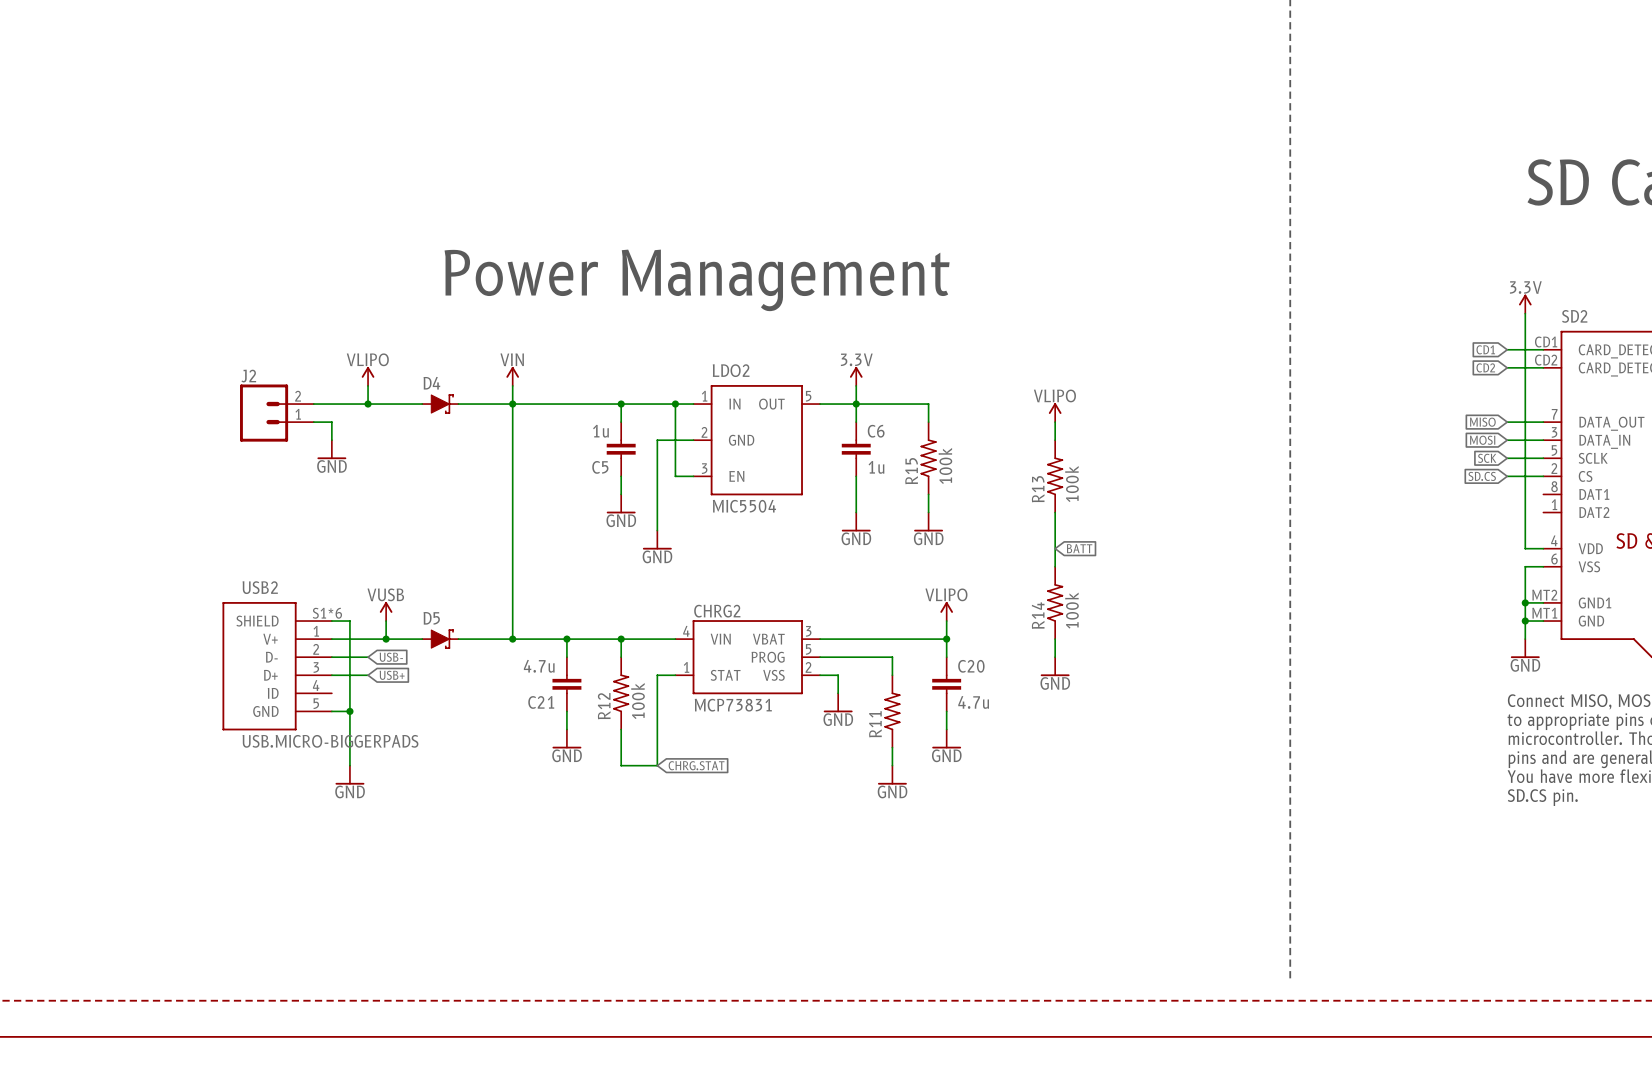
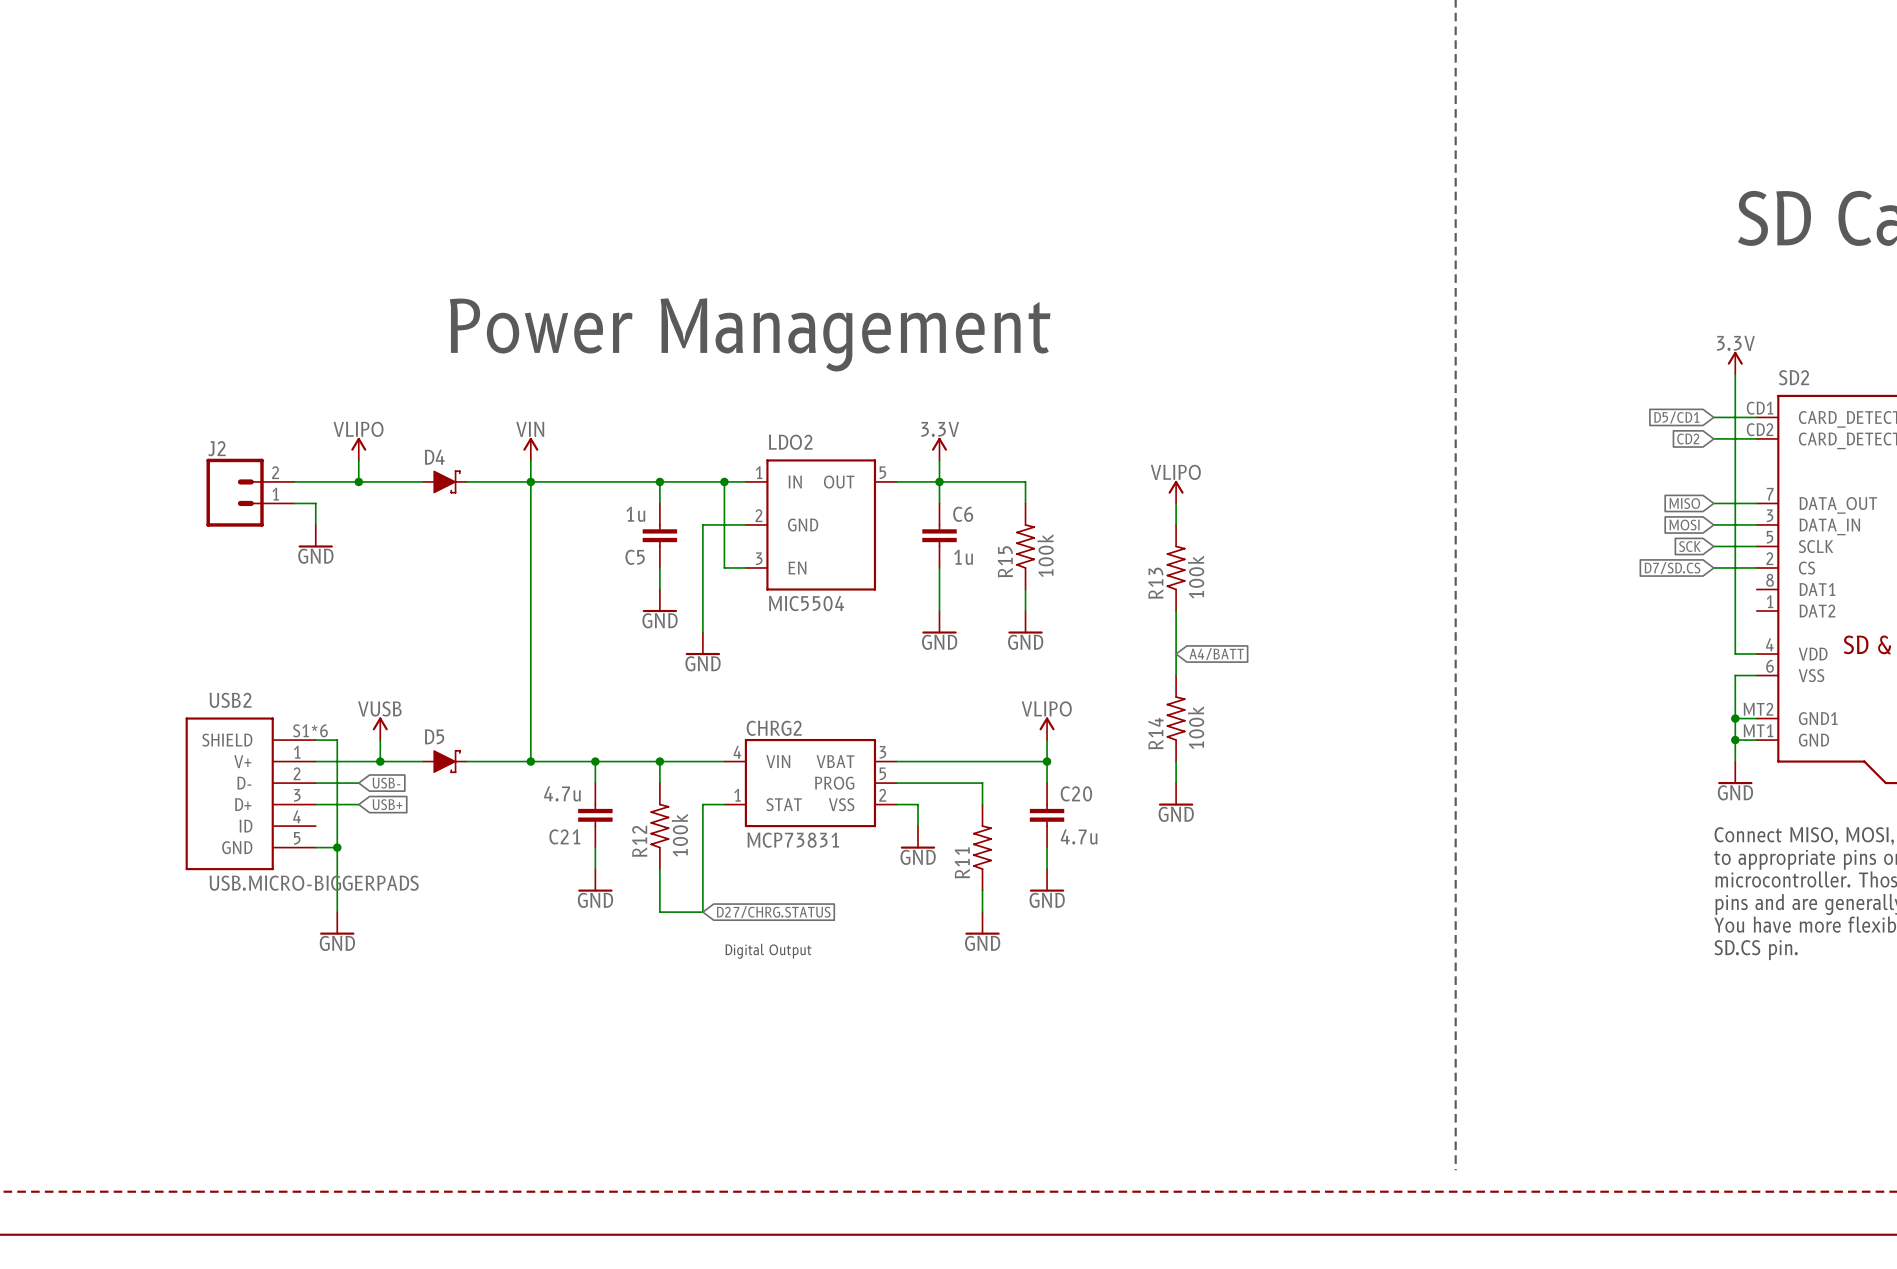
global label: CD1 (1485, 349) -> D5/CD1 (1676, 417)
global label: SD.CS (1482, 476) -> D7/SD.CS (1672, 568)
global label: BATT (1079, 548) -> A4/BATT (1216, 654)
global label: CHRG.STAT (696, 765) -> D27/CHRG.STATUS (773, 912)
text: none -> Digital Output (768, 951)

